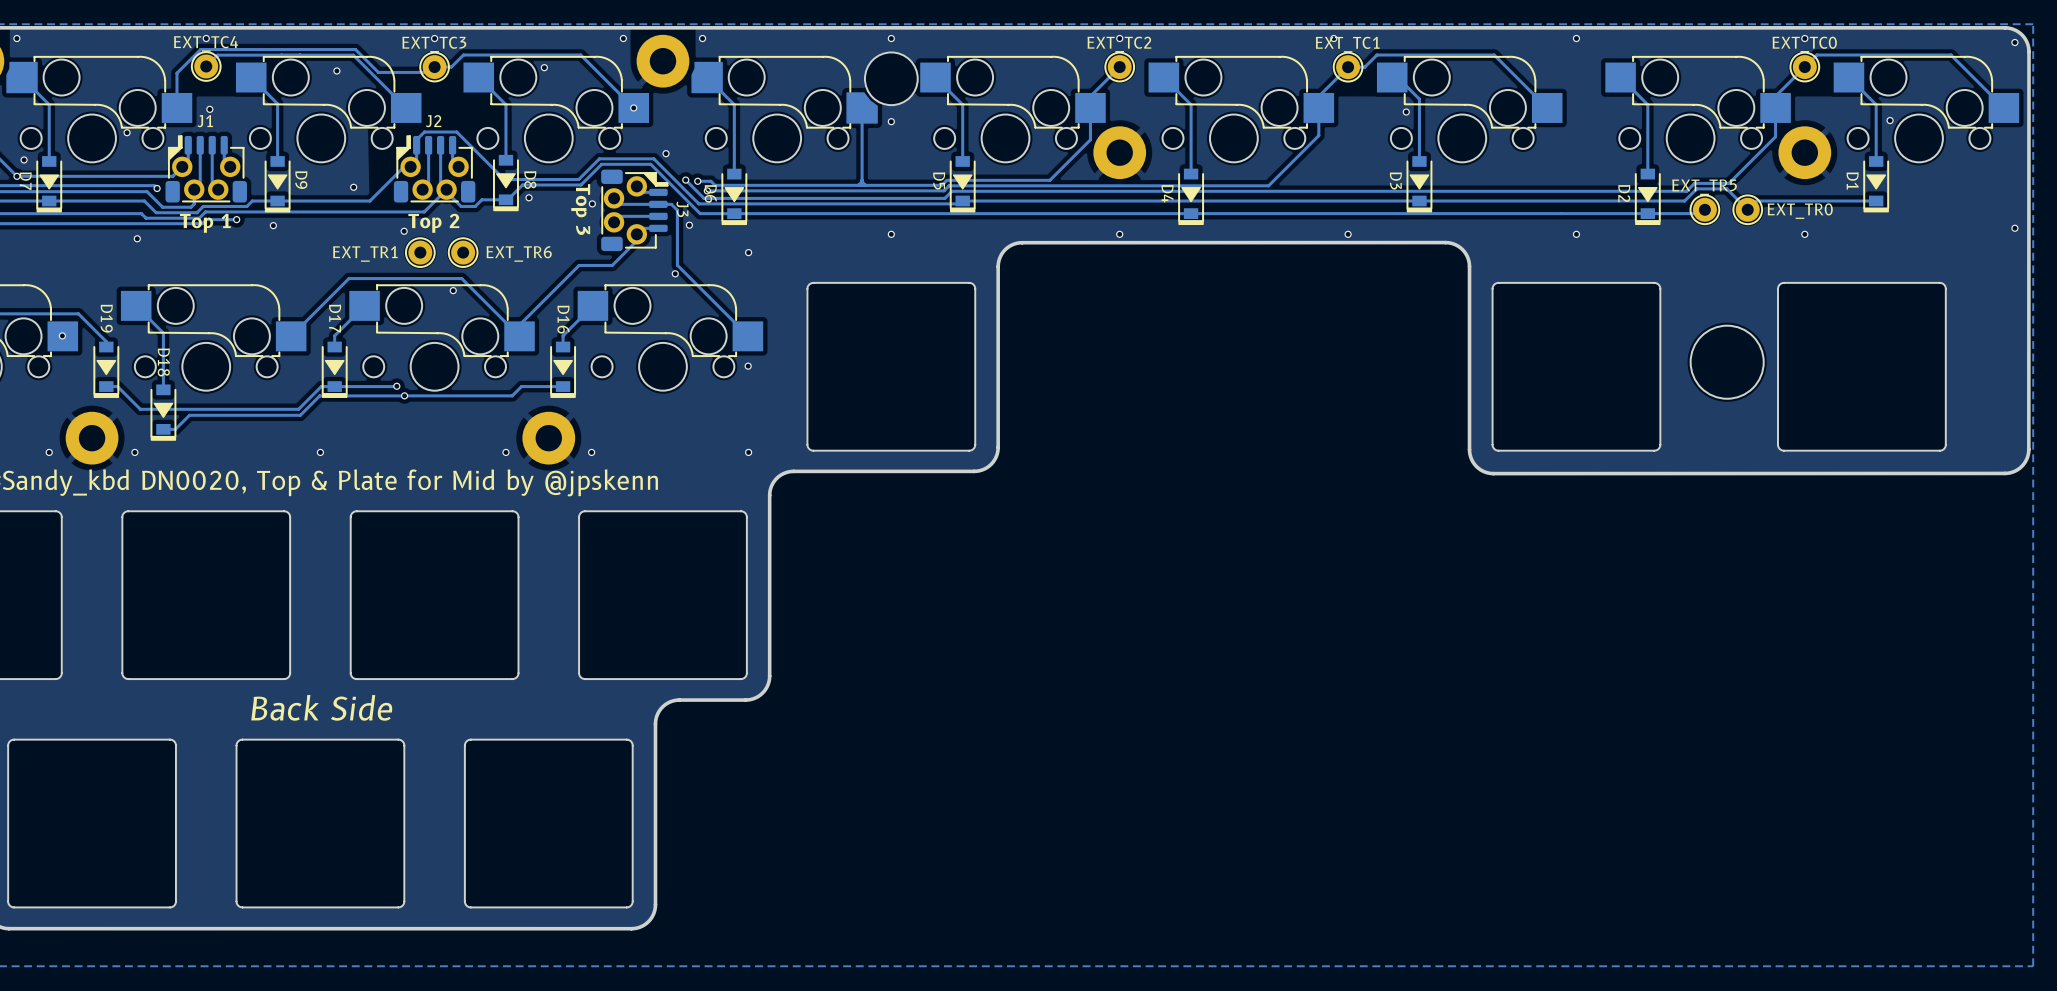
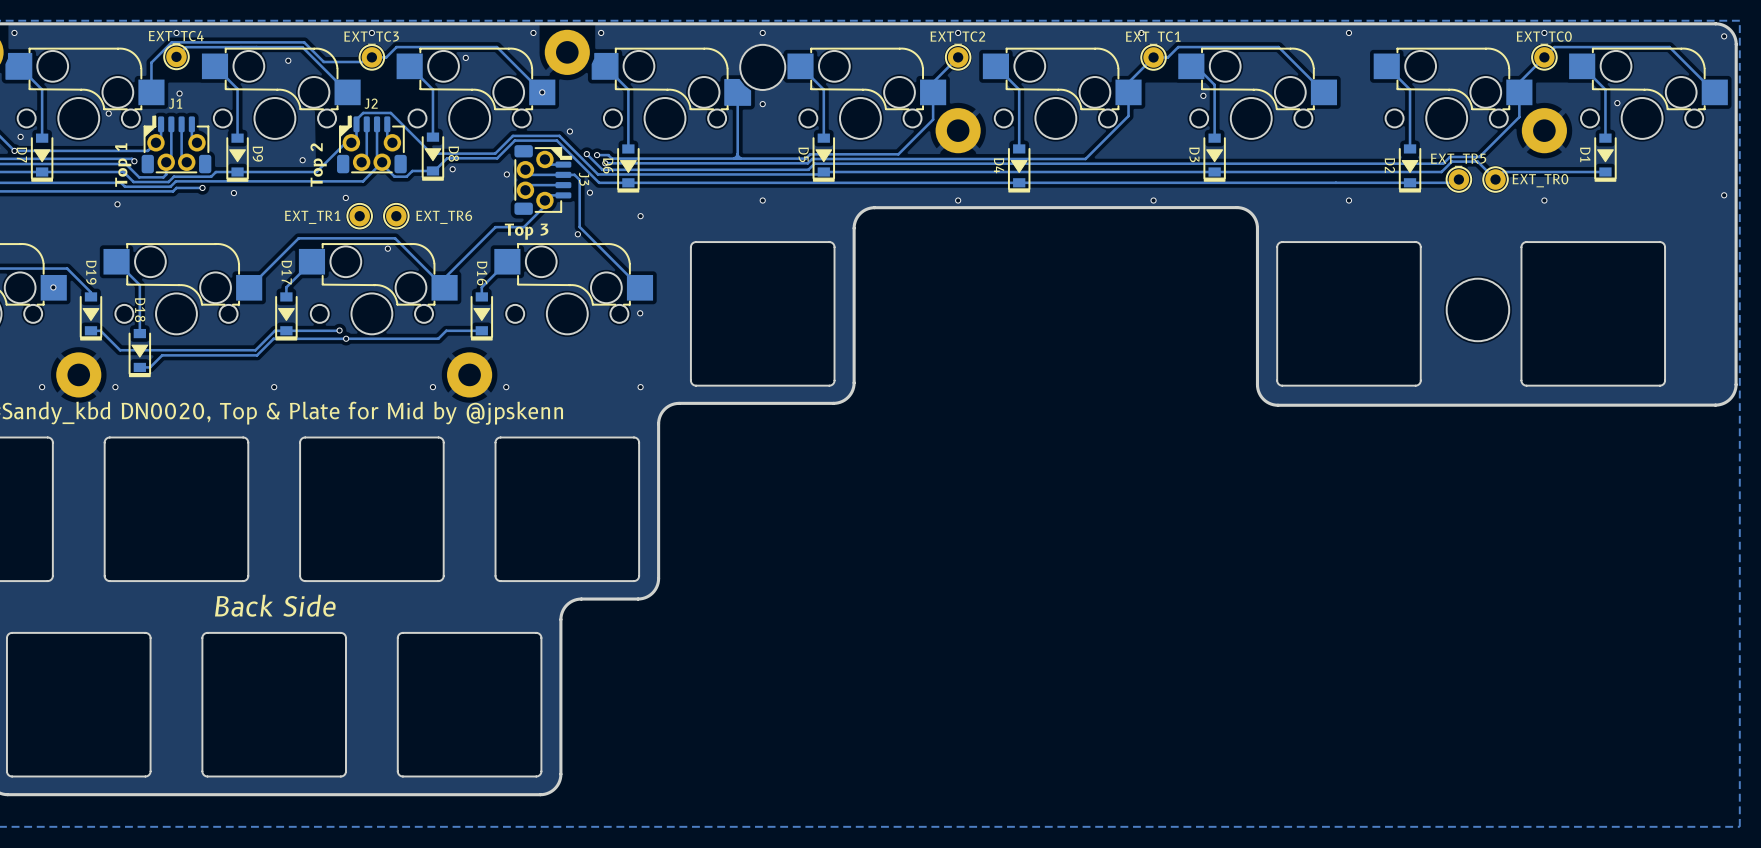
text rotation: 0° (580, 209) -> 90° counterclockwise (526, 231)
text rotation: 0° (205, 223) -> 90° counterclockwise (123, 165)
text rotation: 0° (433, 223) -> 90° counterclockwise (318, 165)

